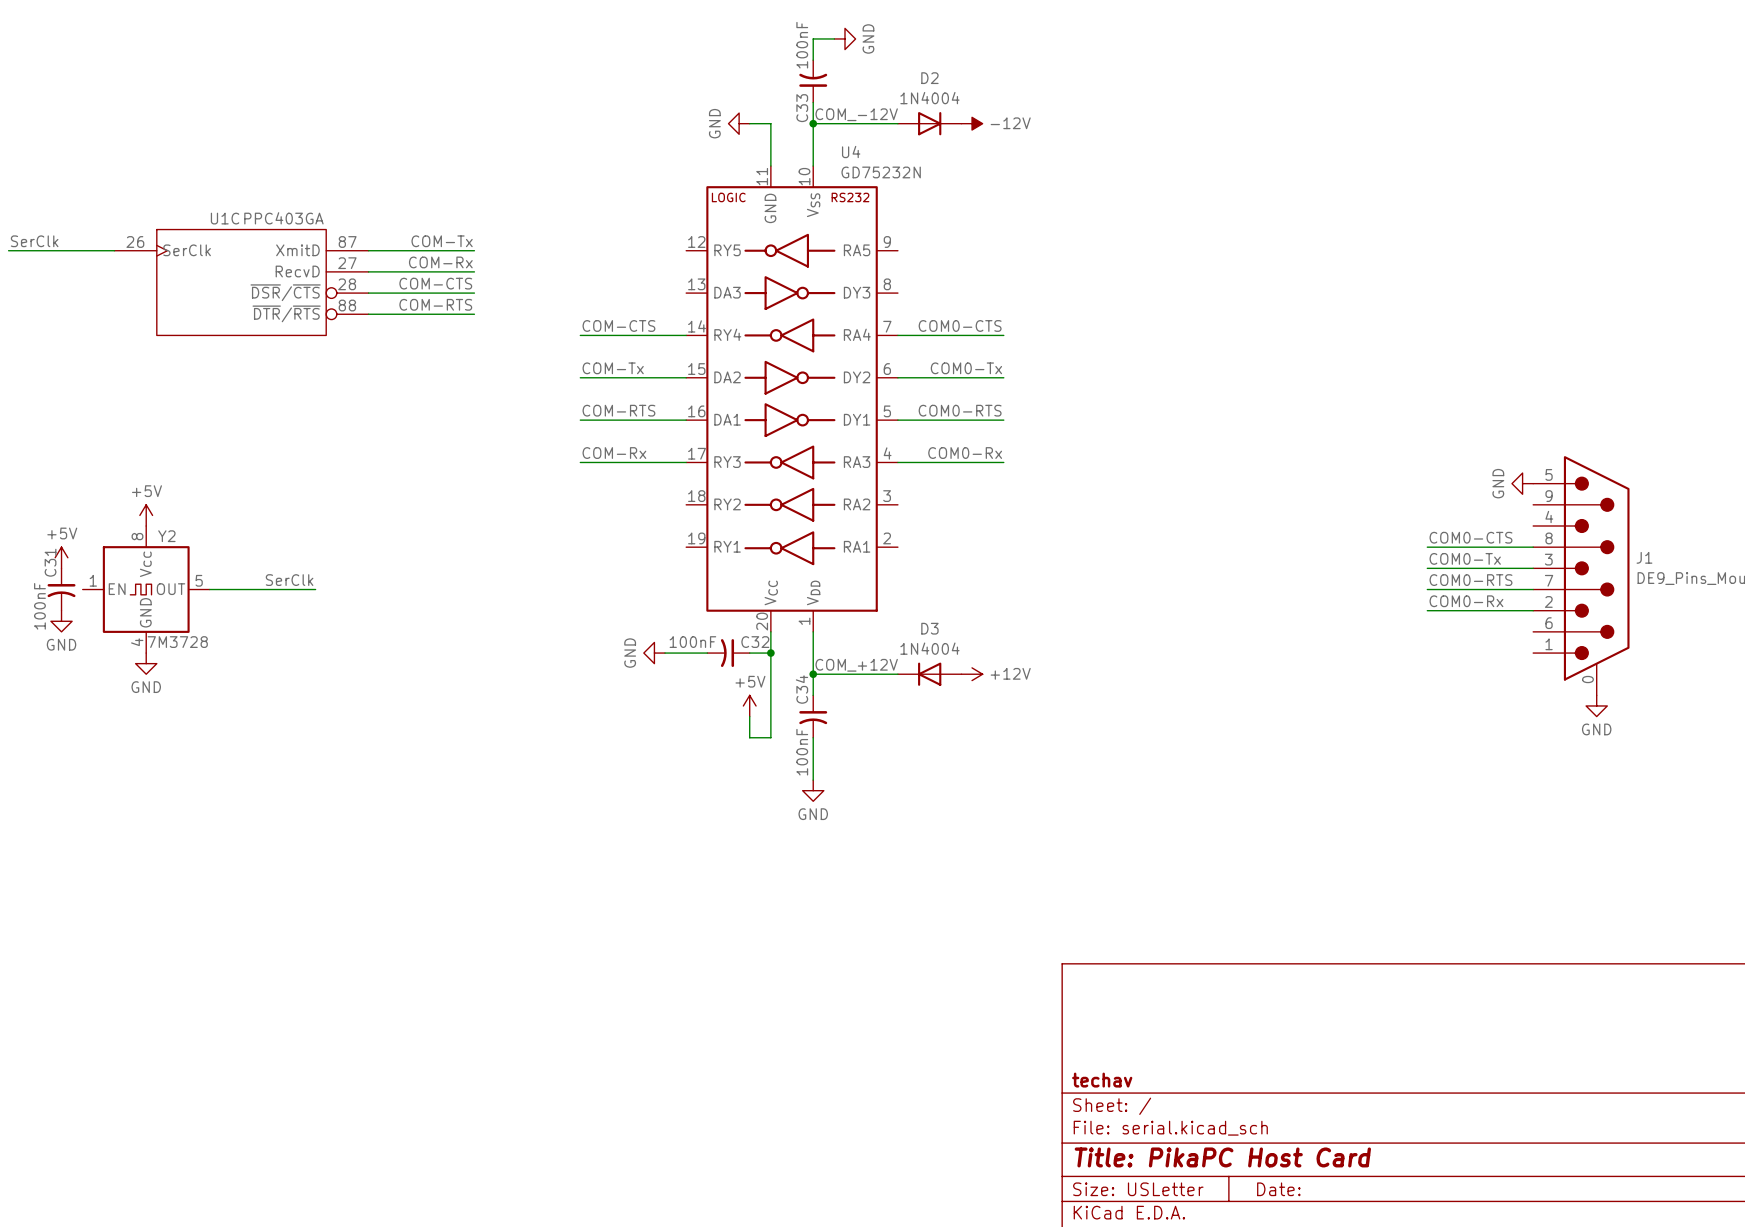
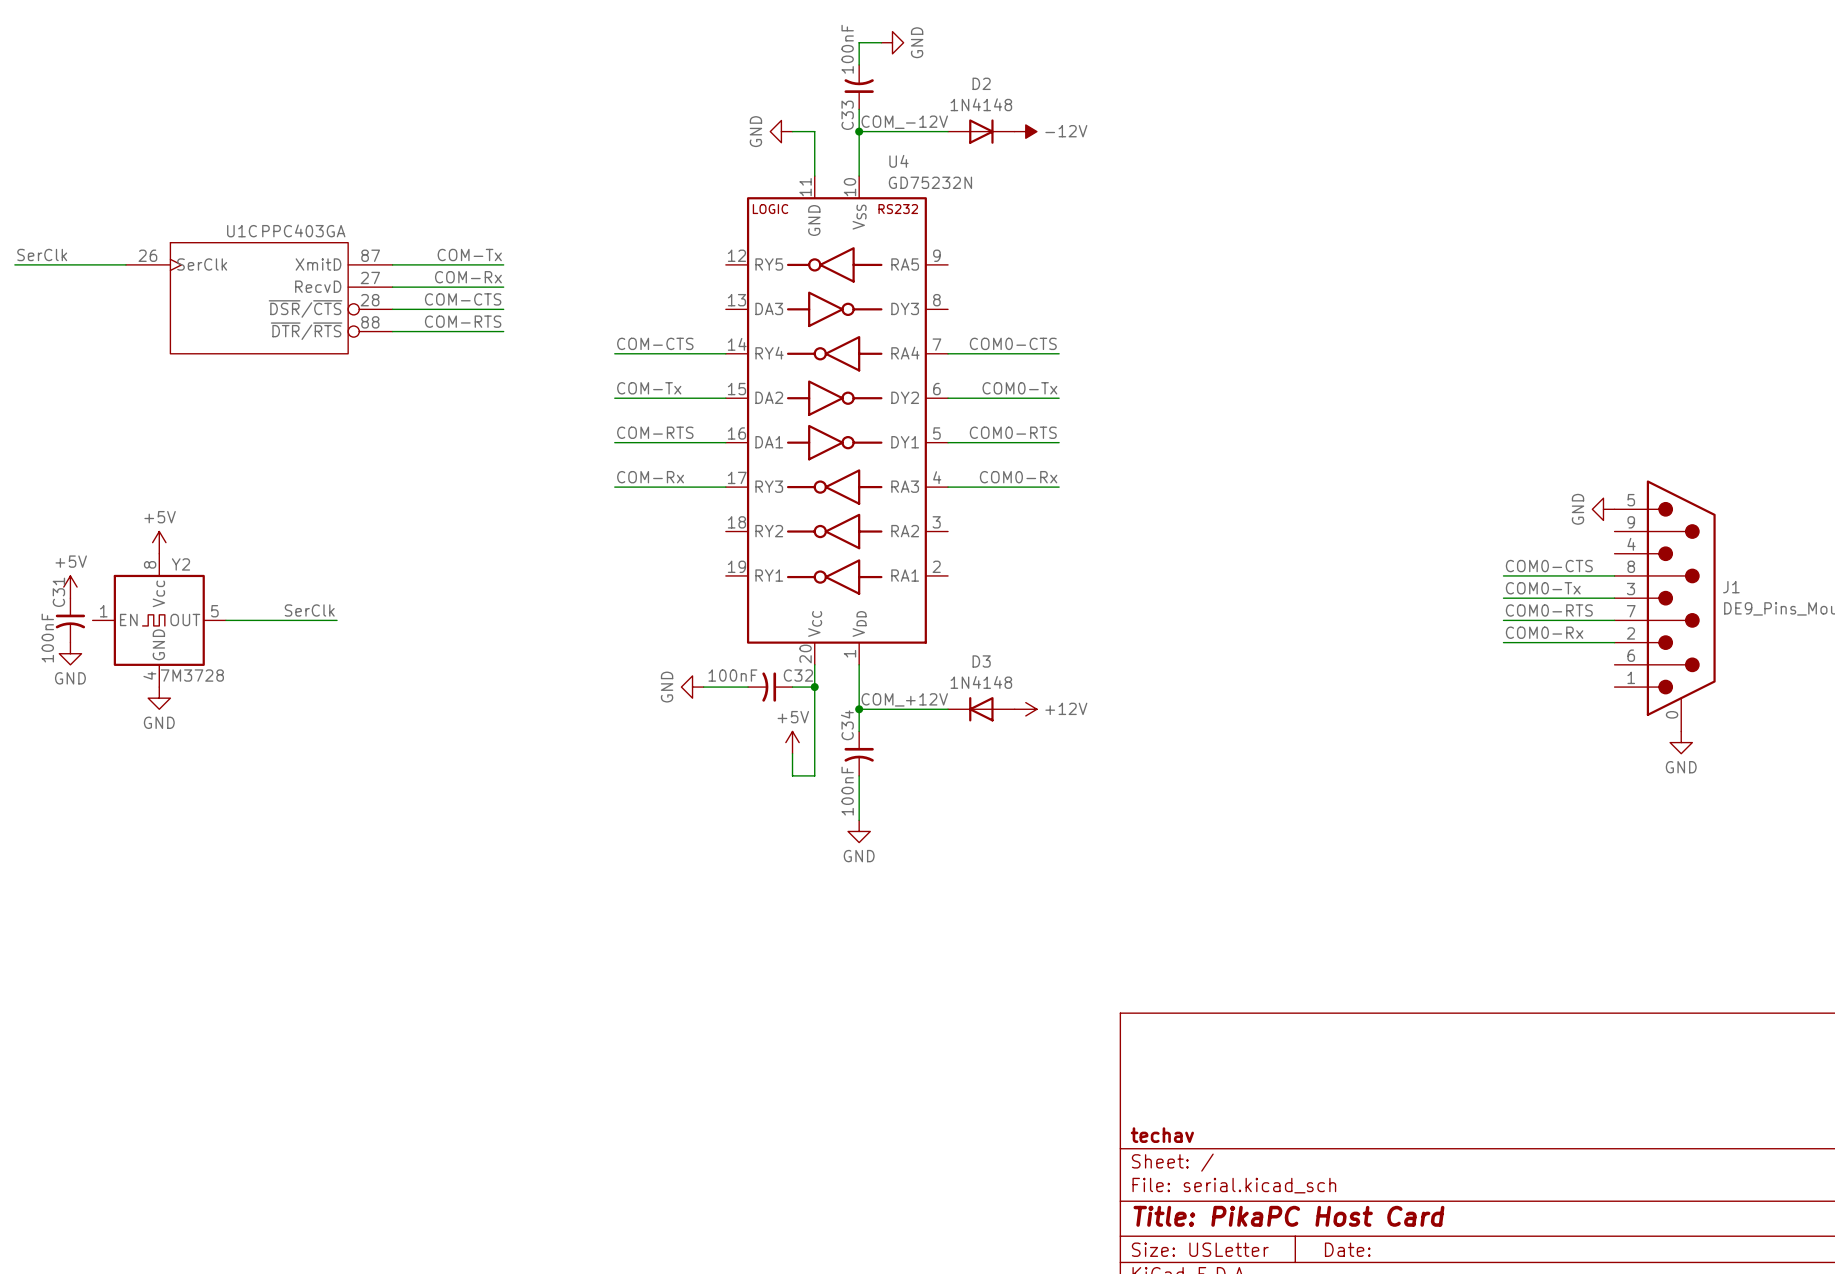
D2 value: 1N4004 (929, 98) -> 1N4148 (981, 104)
D3 value: 1N4004 (929, 648) -> 1N4148 (981, 682)

